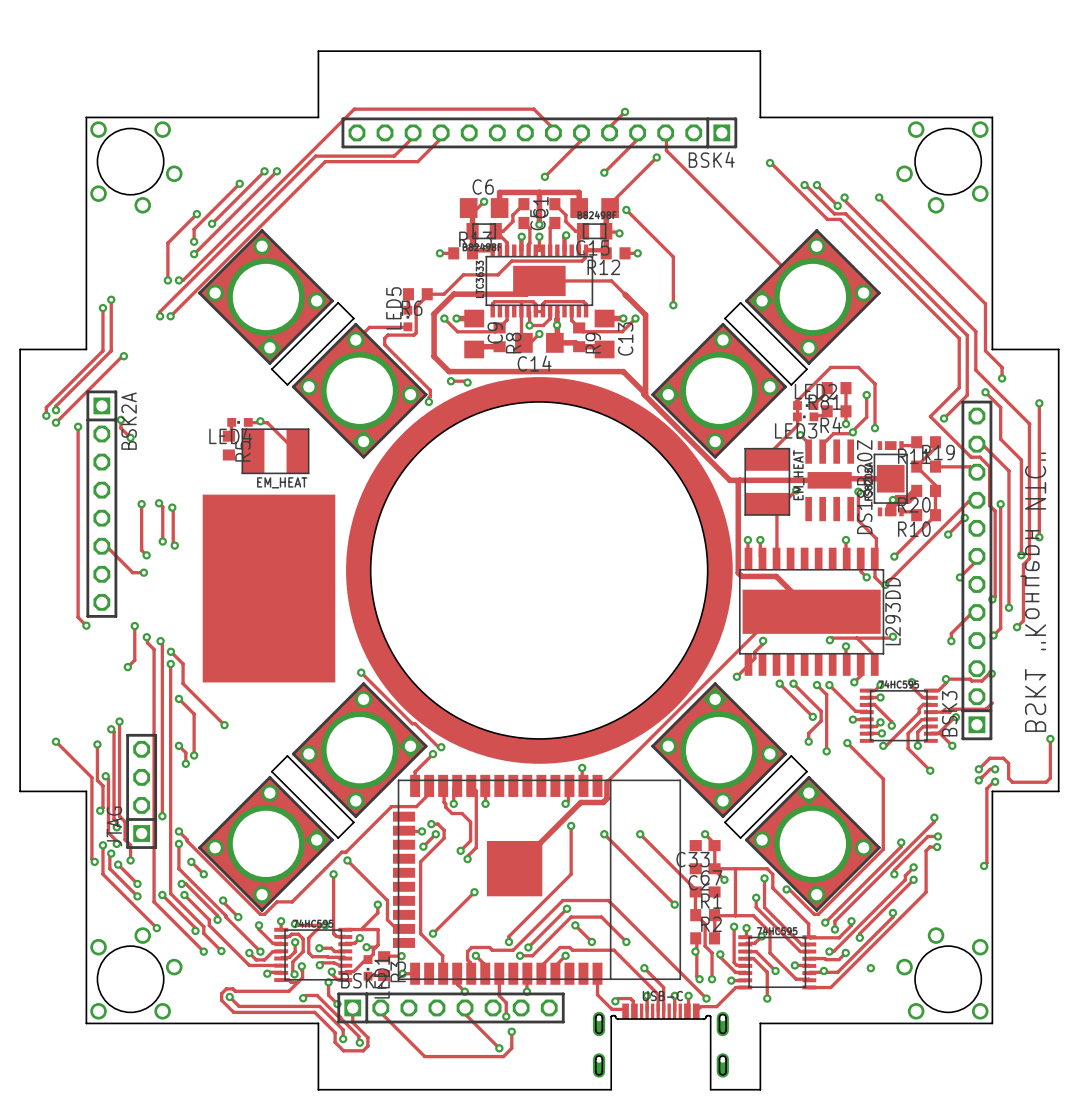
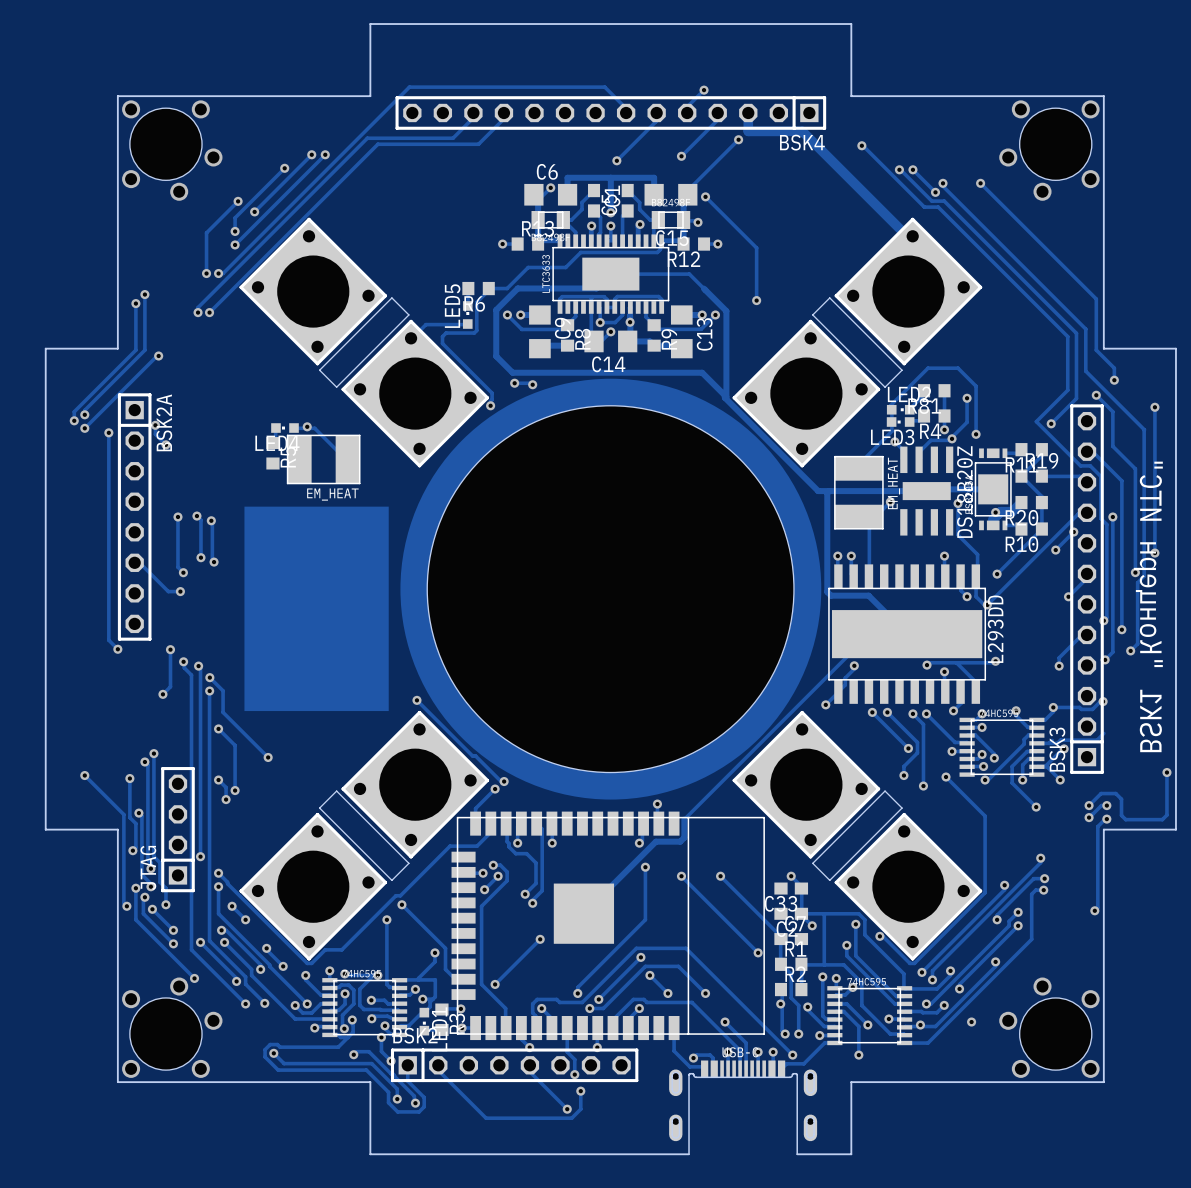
track: (665, 132) (666, 150) (789, 273) -> (748, 112) (748, 131) (802, 131) (909, 238)

